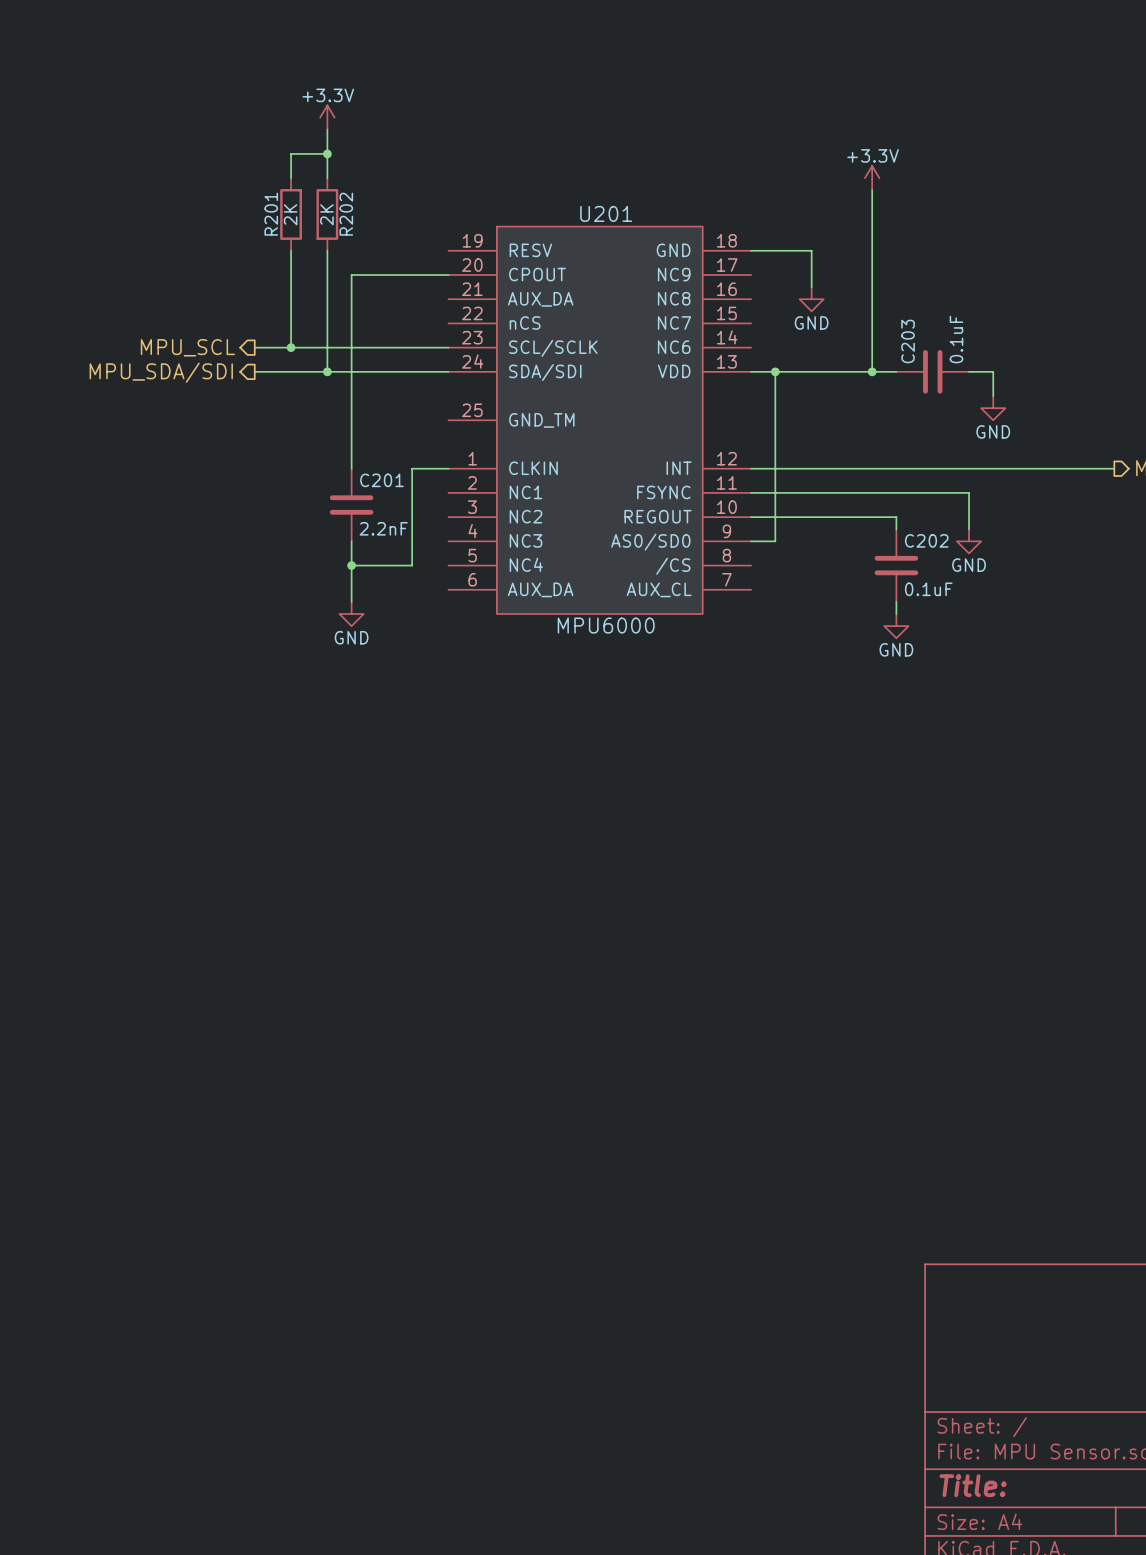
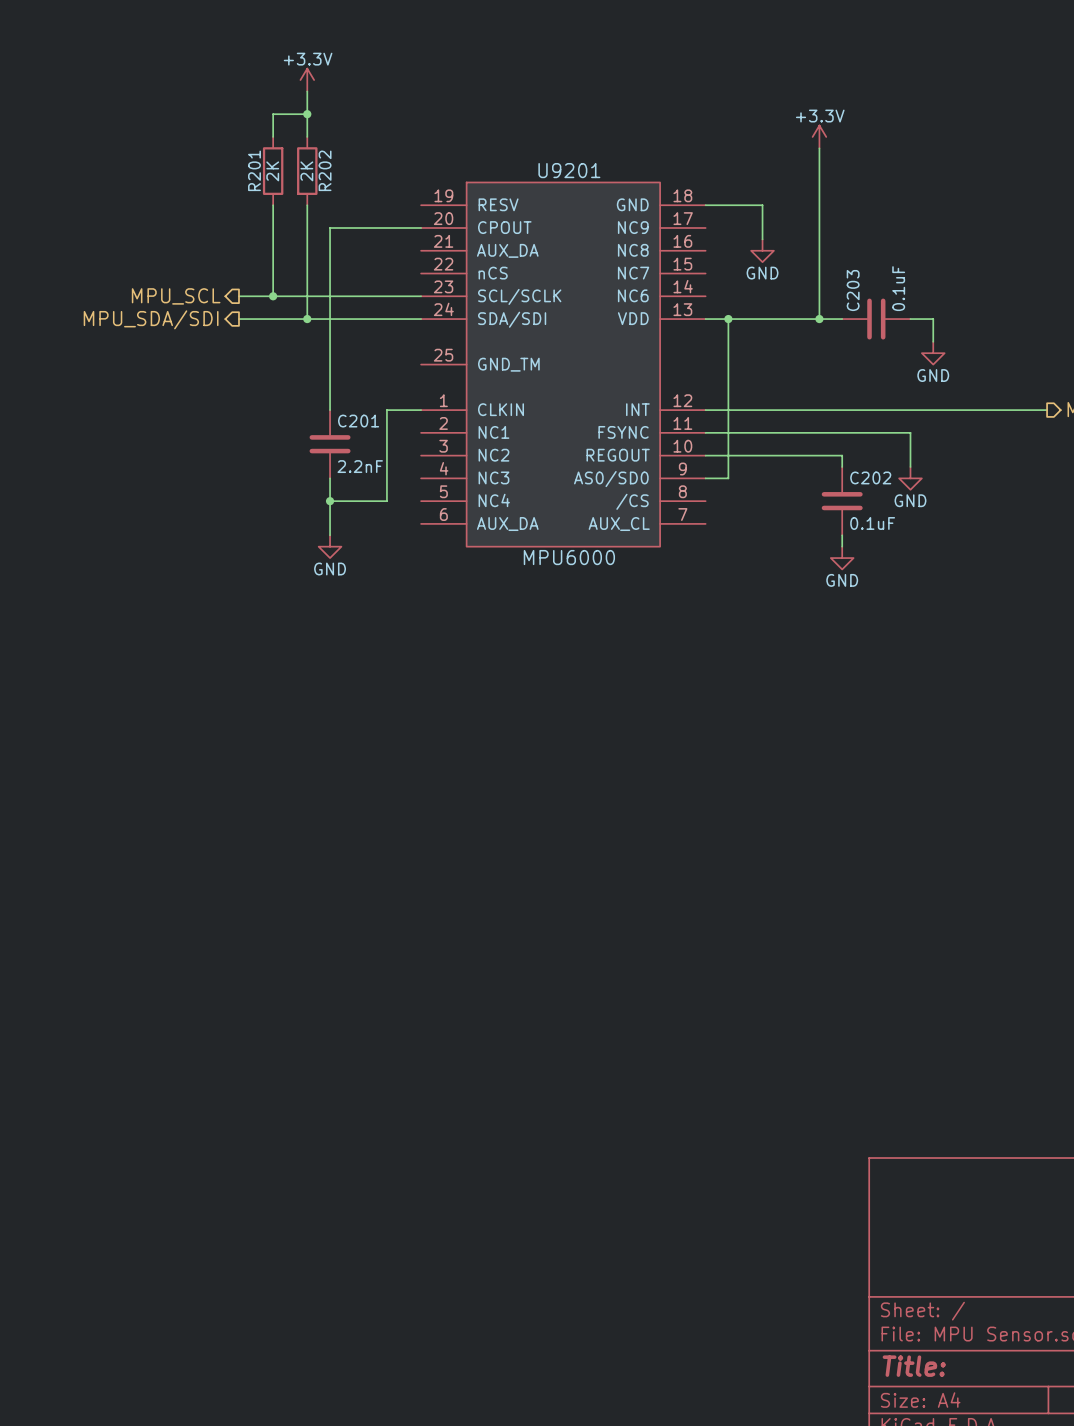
U201 name: U201 (606, 213) -> U9201 (569, 170)

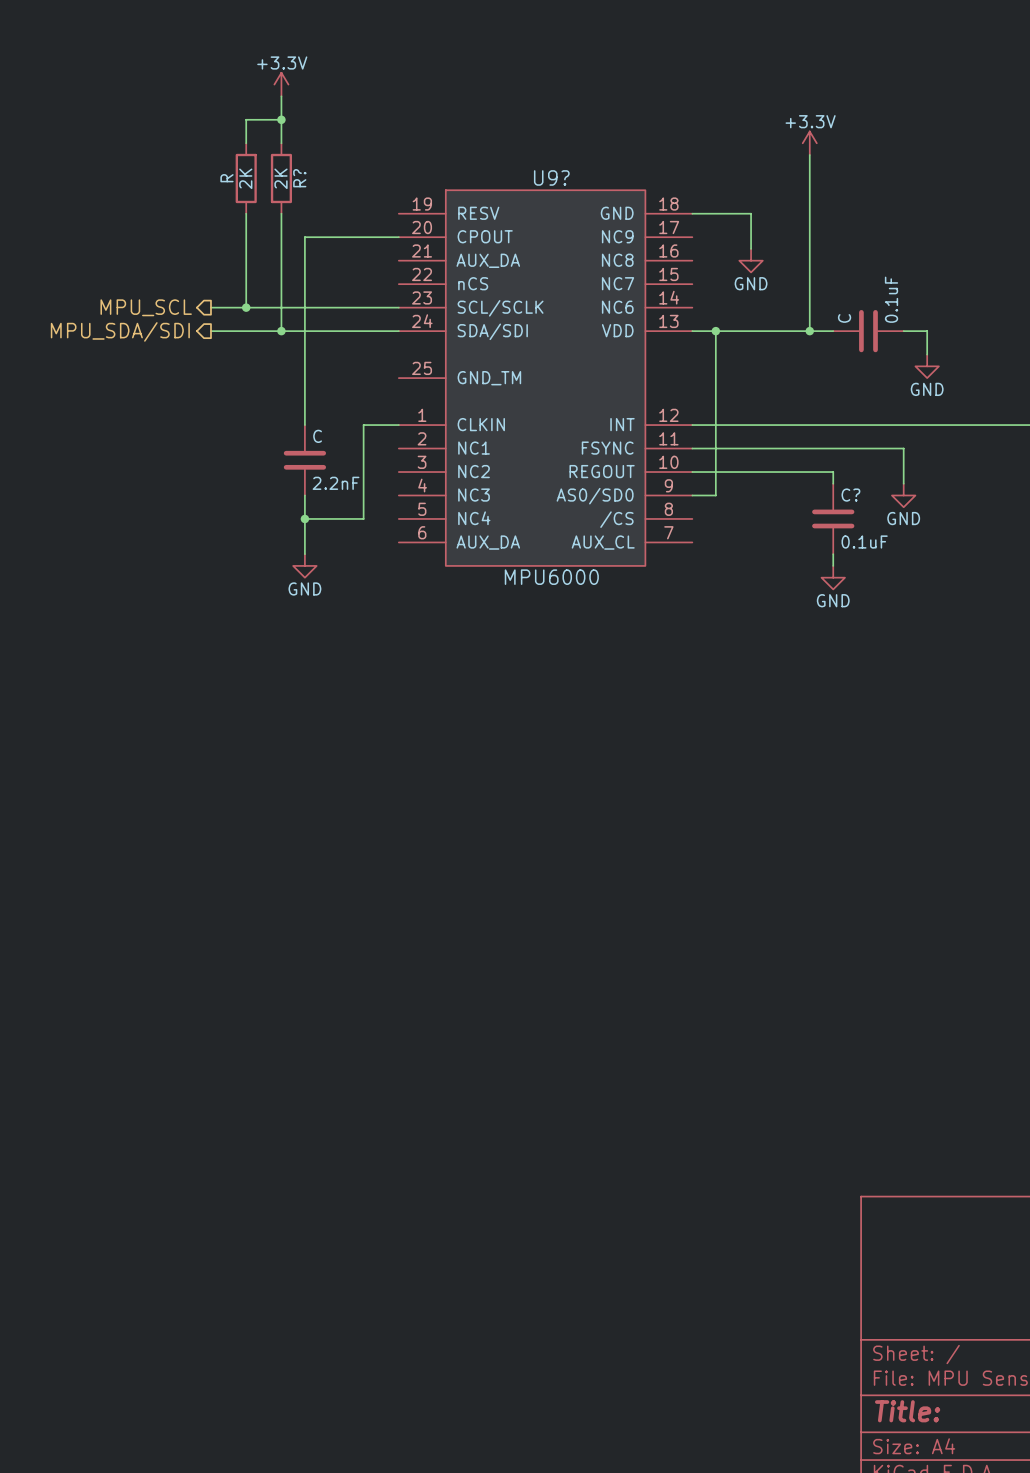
R201 name: R201 (254, 170) -> R (226, 178)
R202 name: R202 (325, 170) -> R? (299, 178)
U9201 name: U9201 (569, 170) -> U9? (551, 177)
C203 name: C203 (853, 290) -> C (844, 318)
C201 name: C201 (358, 421) -> C (317, 436)
C202 name: C202 (870, 477) -> C? (850, 495)

